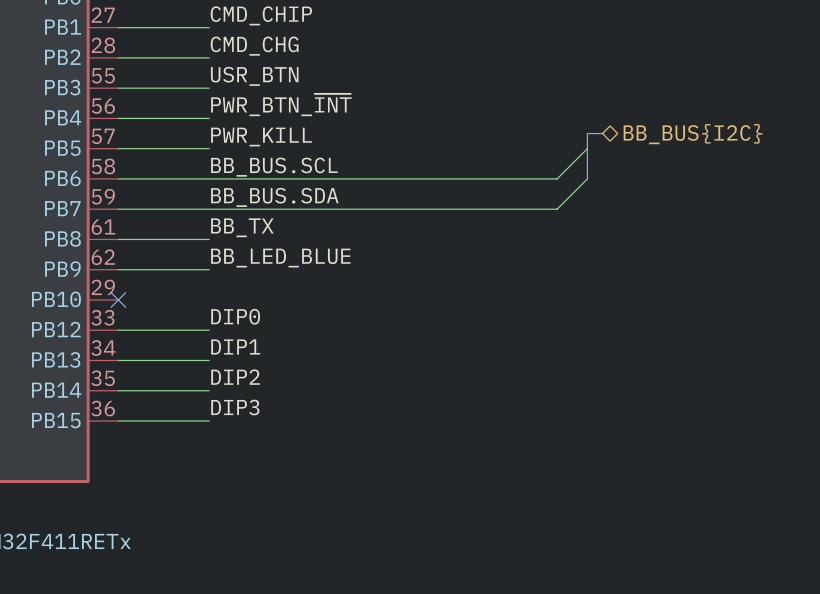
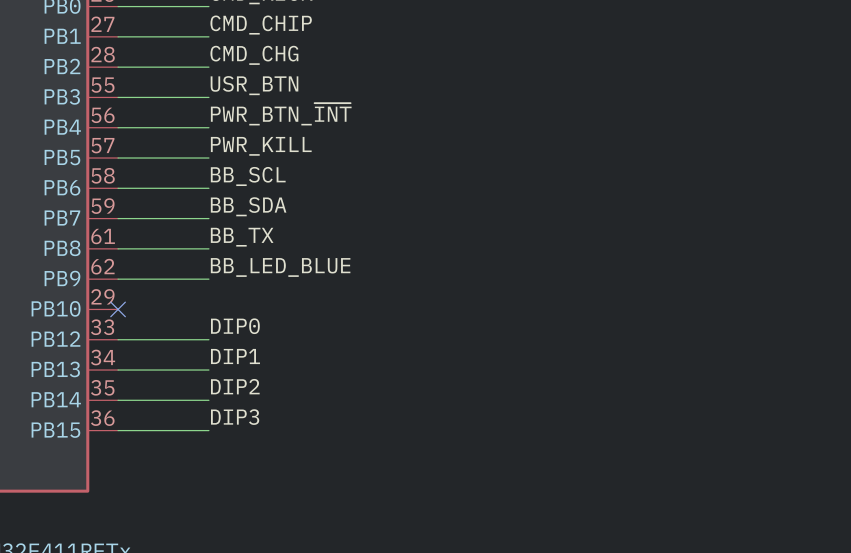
bus: (602, 133) (587, 133) (587, 178) -> none
hierarchical label: BB_BUS{I2C} (693, 134) -> none
wire: (587, 148) (557, 178) (209, 178) -> none
label: BB_BUS.SCL (274, 167) -> BB_SCL (248, 176)
wire: (587, 178) (557, 209) (209, 209) -> none
label: BB_BUS.SDA (274, 197) -> BB_SDA (248, 206)

